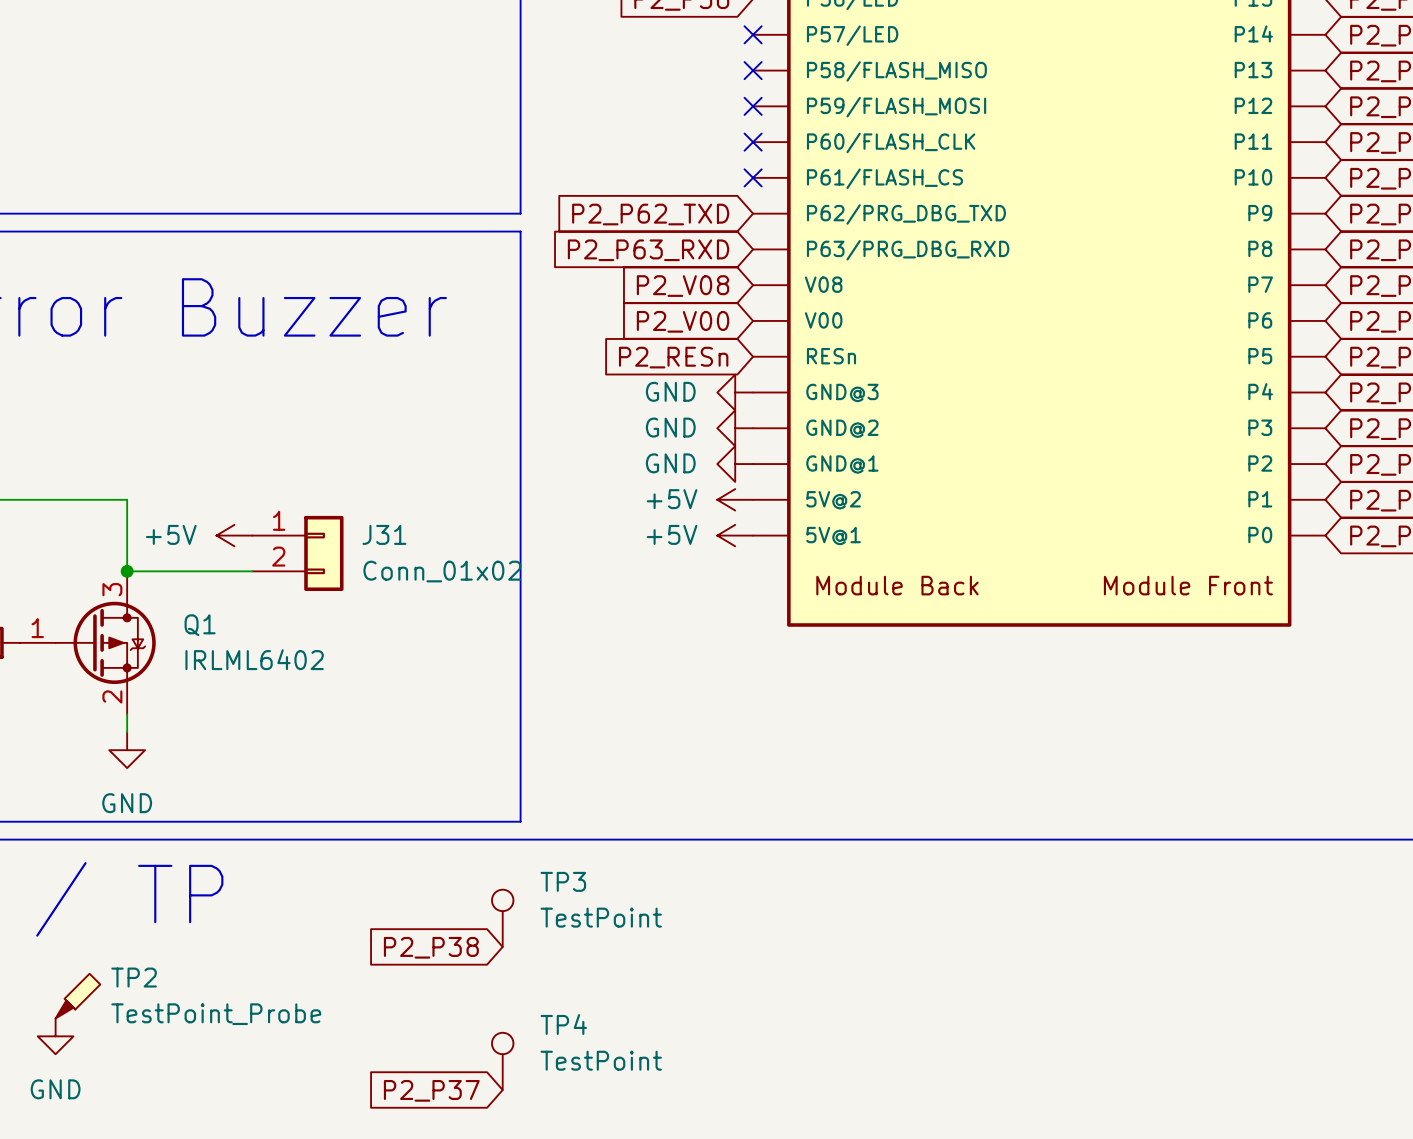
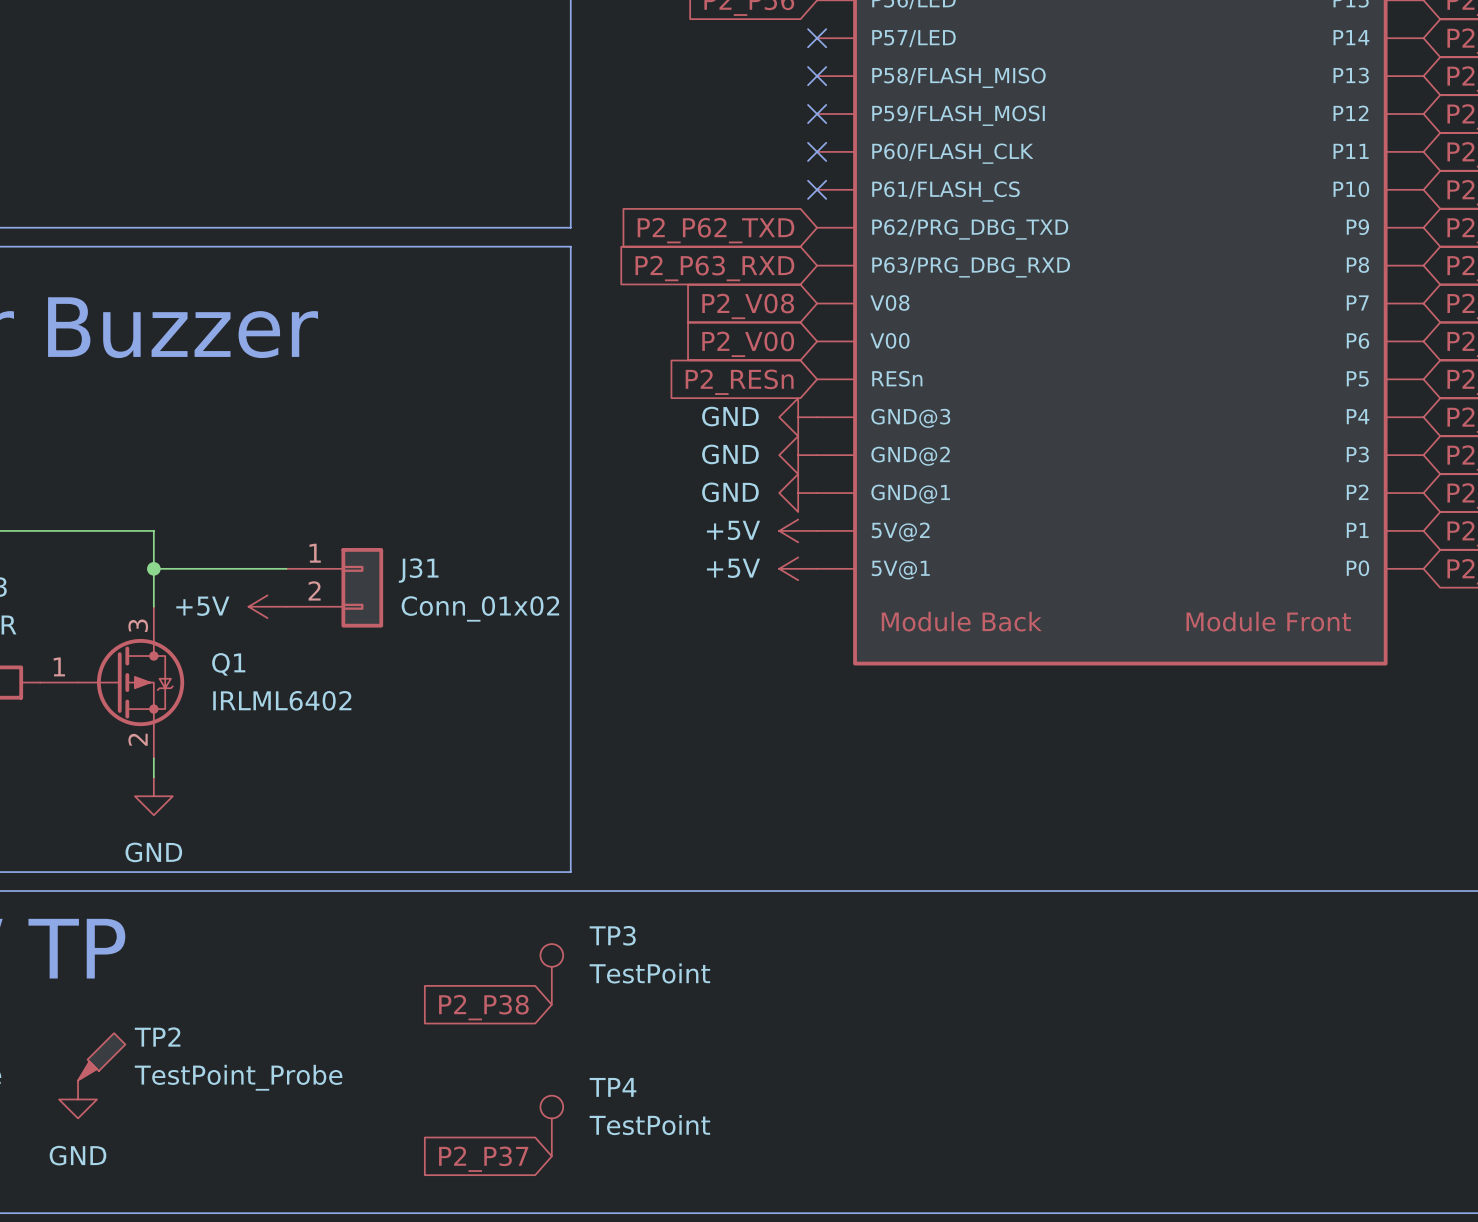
power symbol position: +5V (234, 535) -> +5V (267, 606)
wire: (127, 571) (252, 571) -> (153, 568) (286, 568)
junction position: (127, 571) -> (153, 568)

